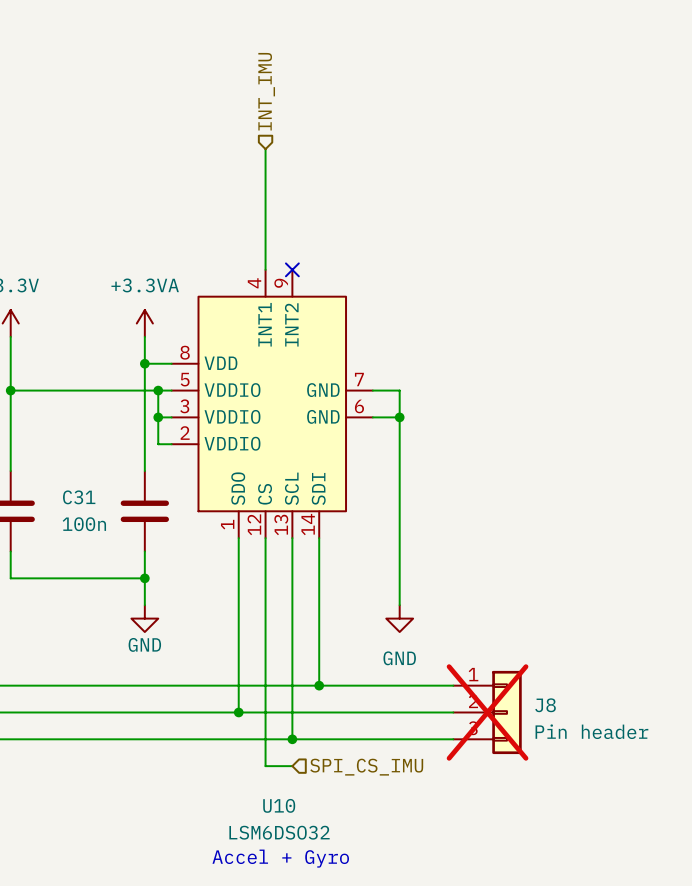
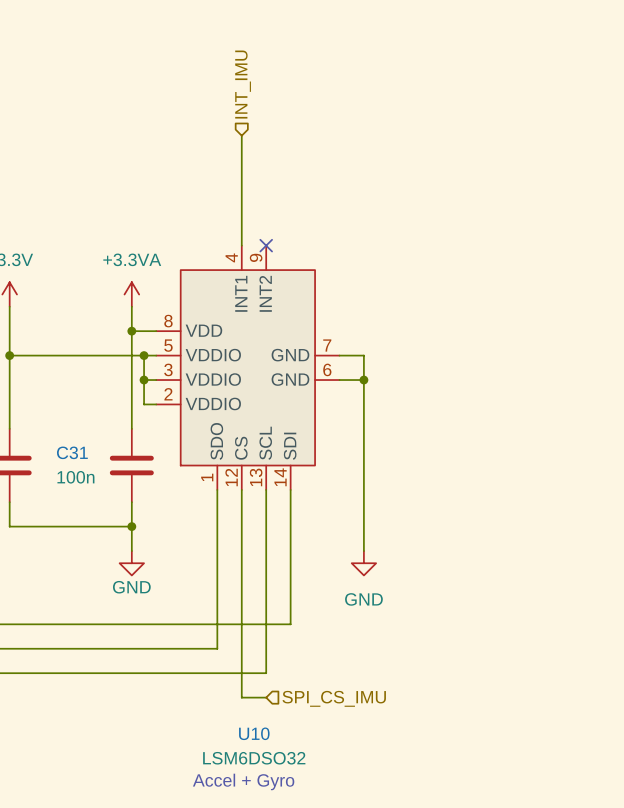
wire: (319, 685) (453, 685) -> none
junction: (319, 685) -> none
wire: (238, 712) (453, 712) -> none
junction: (238, 712) -> none
J8: Pin header (487, 712) -> none
wire: (292, 739) (453, 739) -> none
junction: (292, 739) -> none

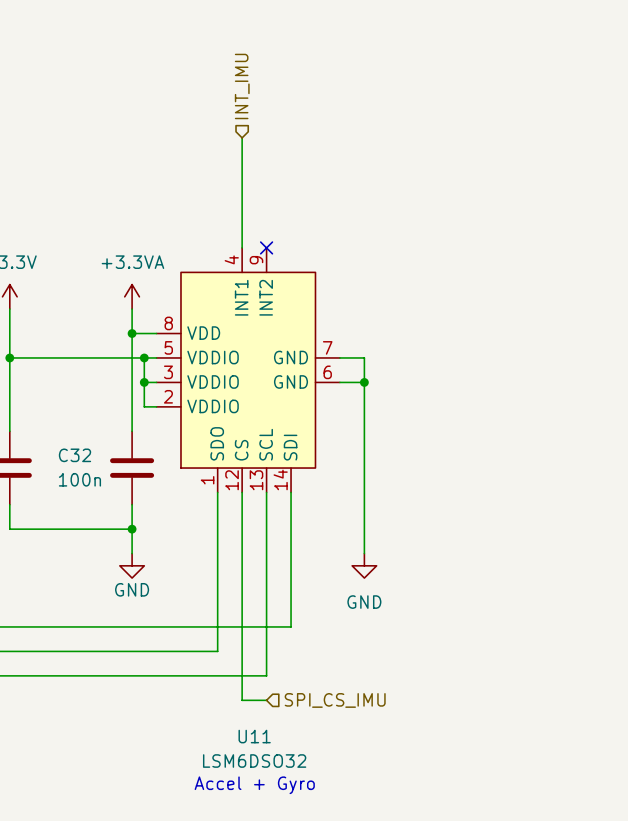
C31 name: C31 (72, 452) -> C32 (74, 455)
U10 name: U10 (254, 733) -> U11 (254, 736)

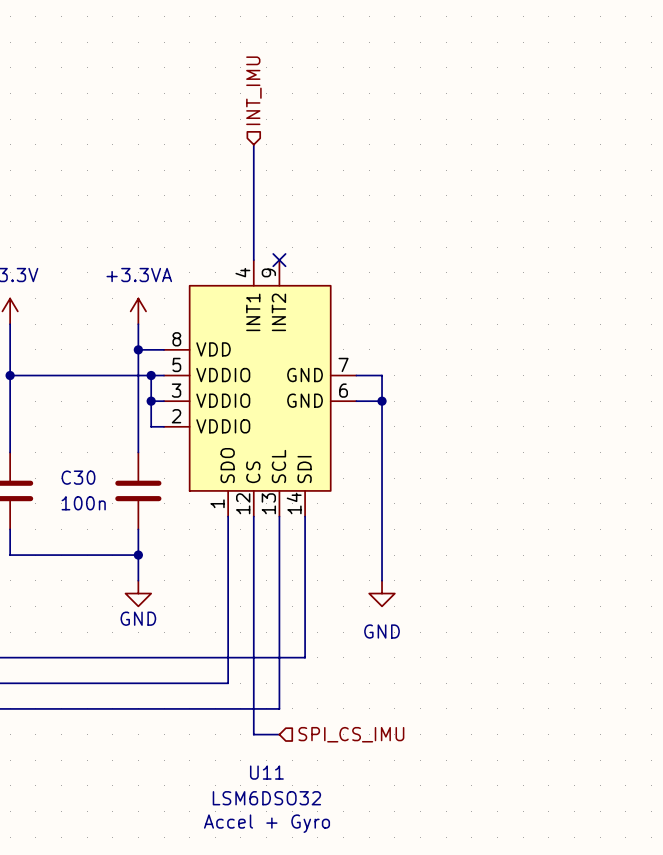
C32 name: C32 (74, 455) -> C30 (78, 477)

